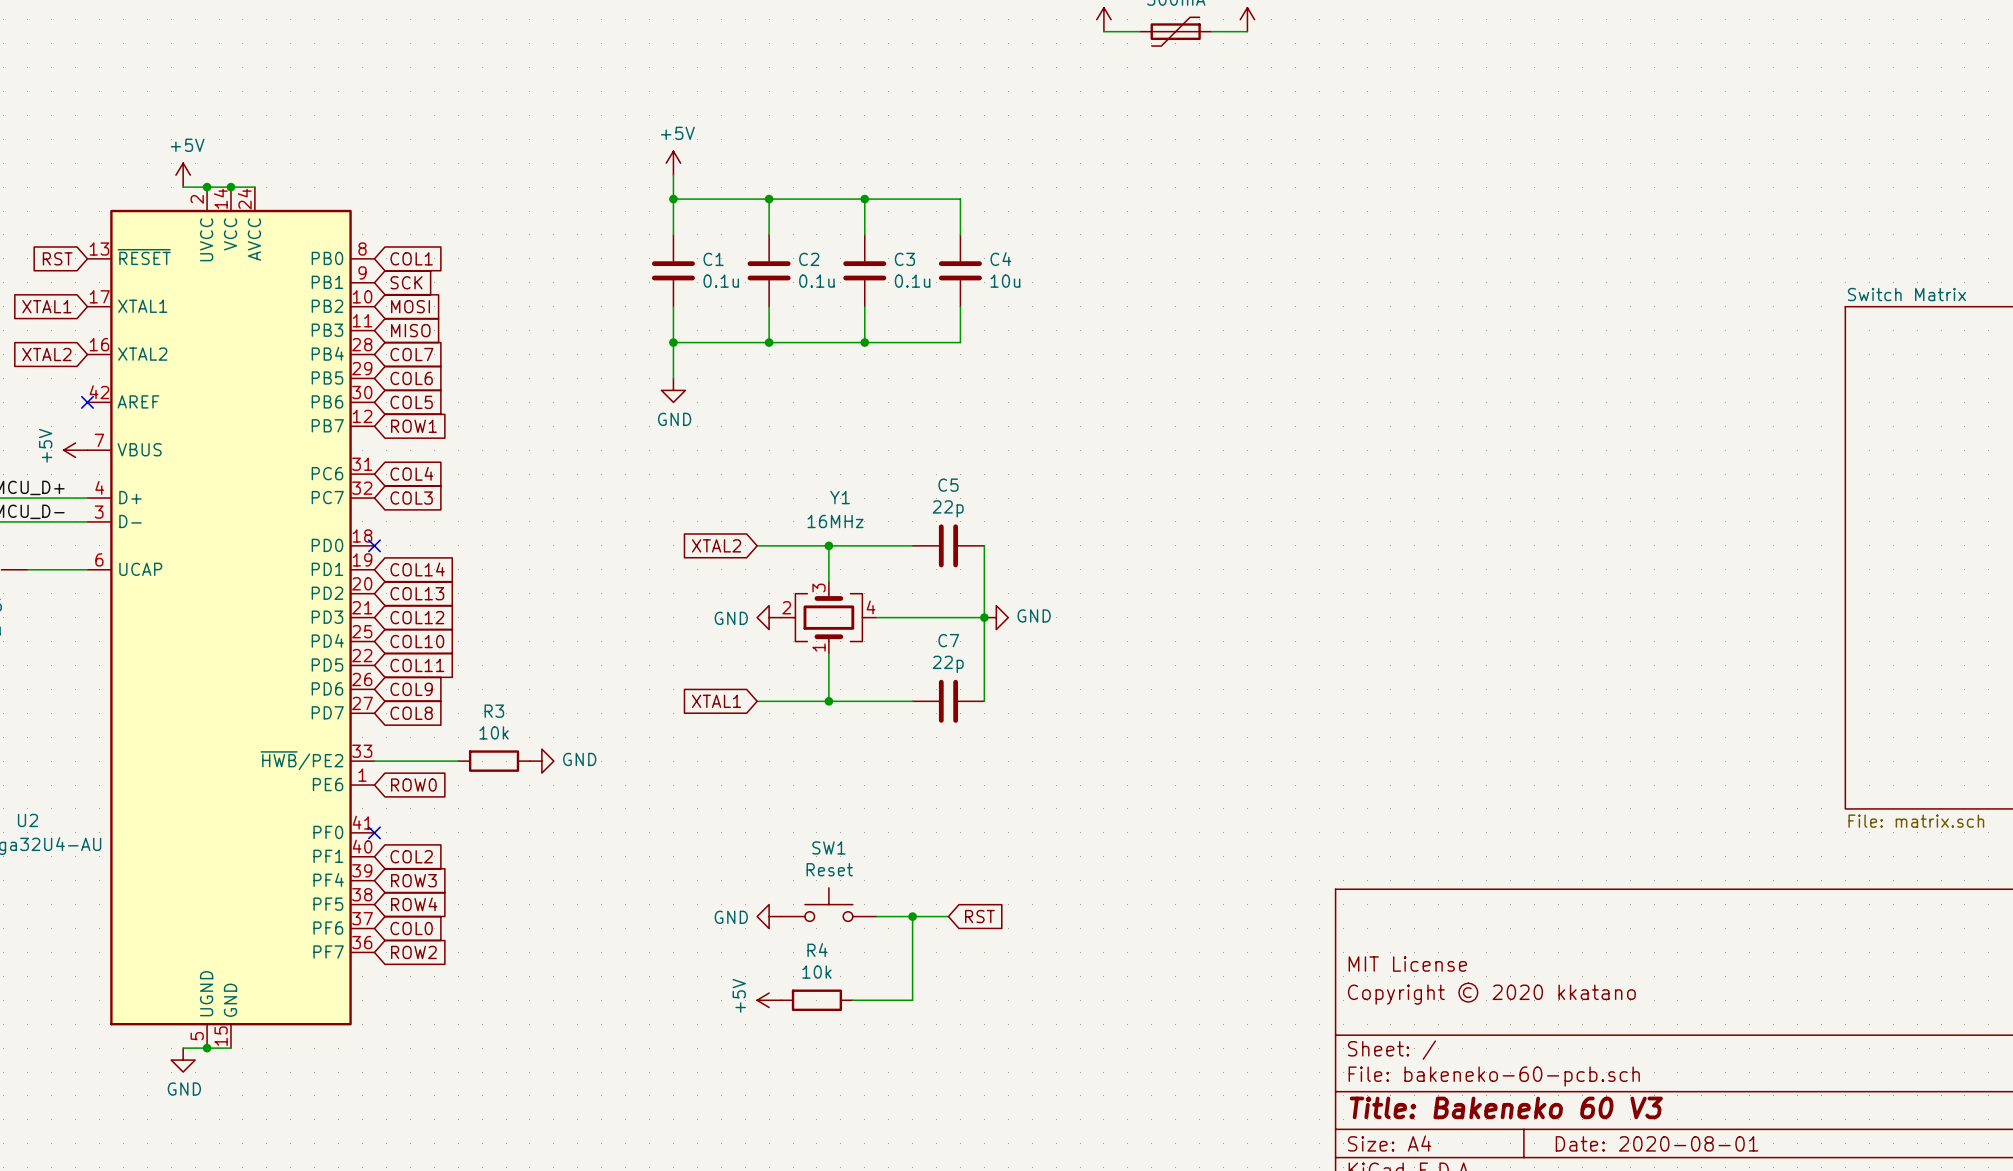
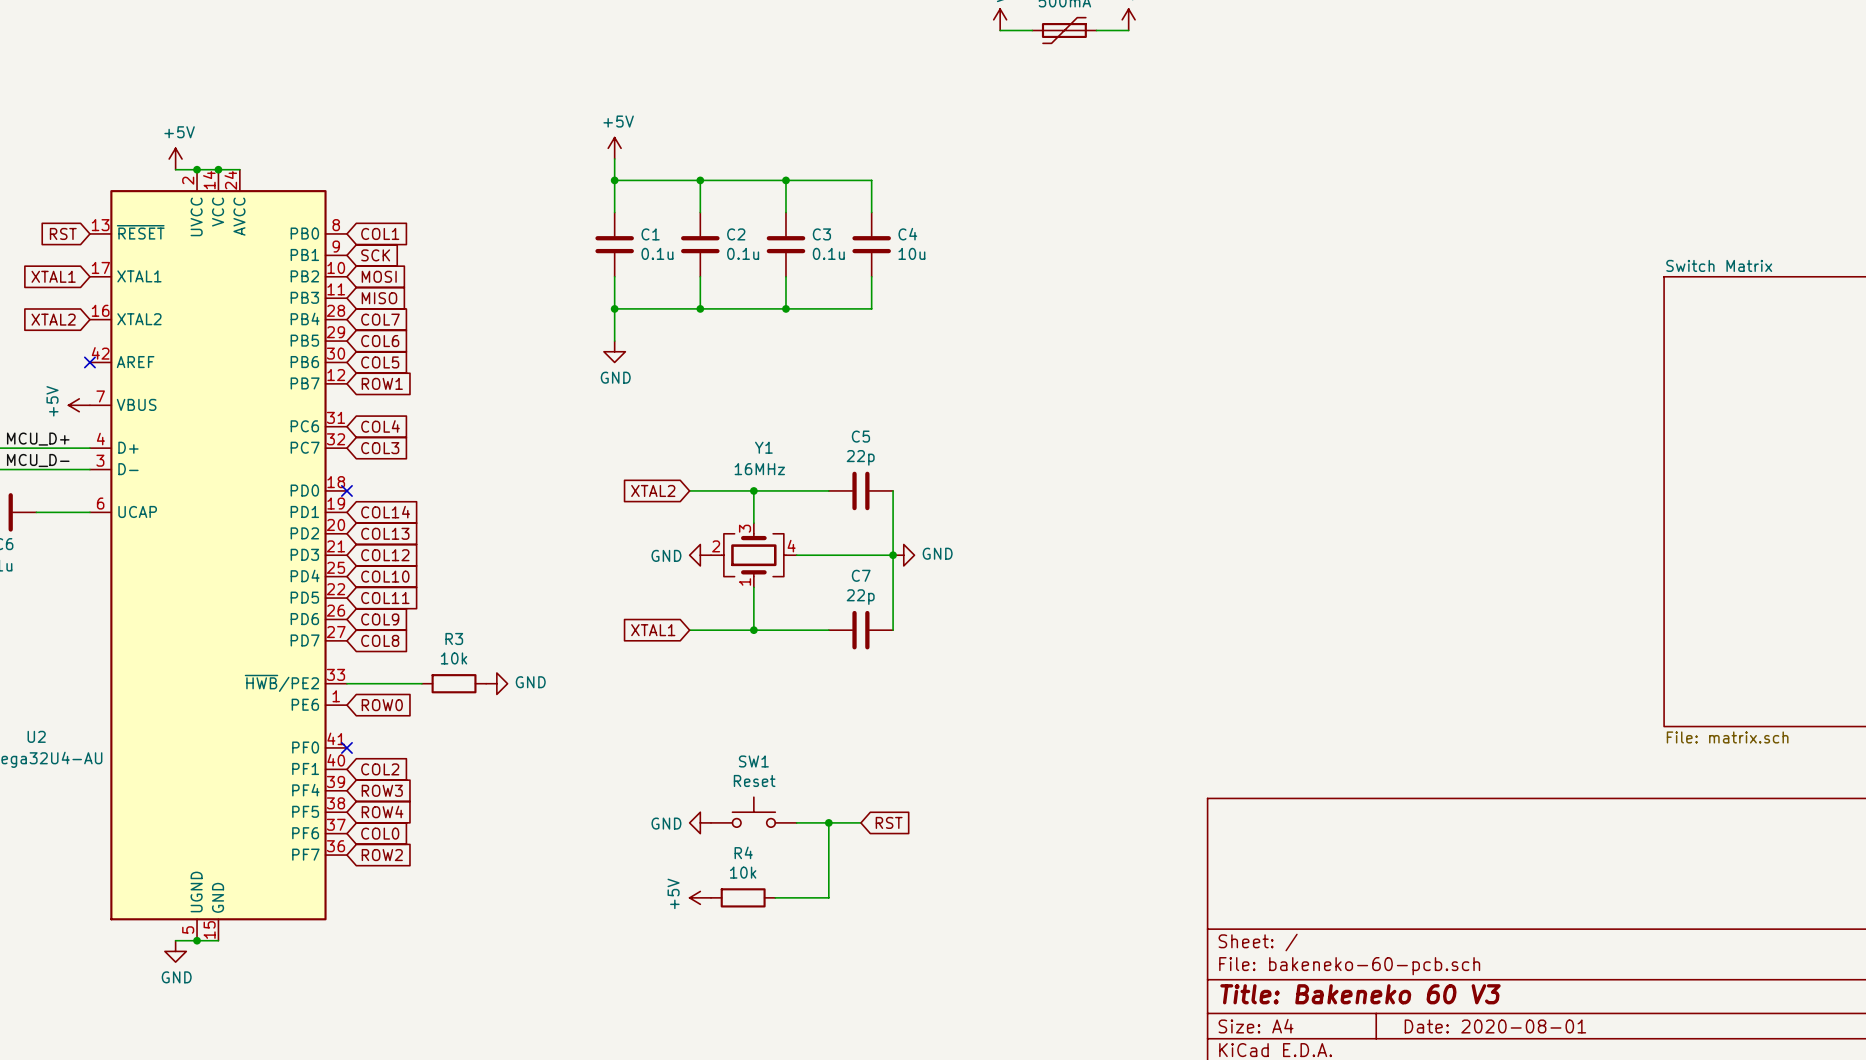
title block: MIT License (1407, 964) -> none
title block: Copyright © 2020 kkatano (1491, 993) -> none

